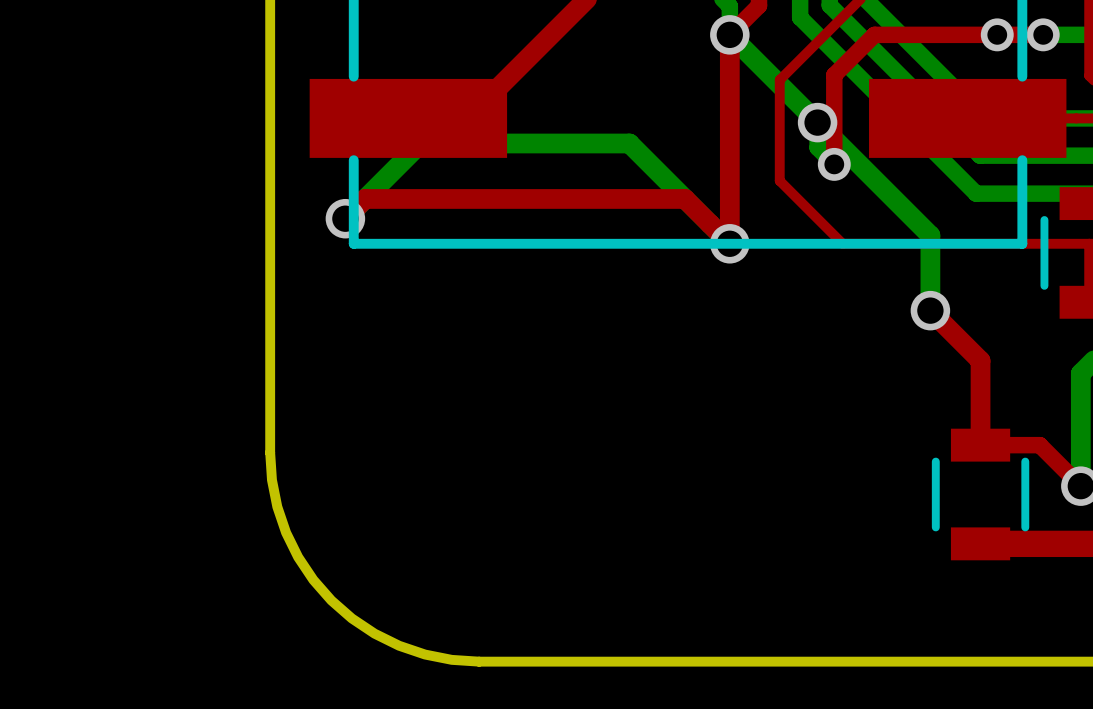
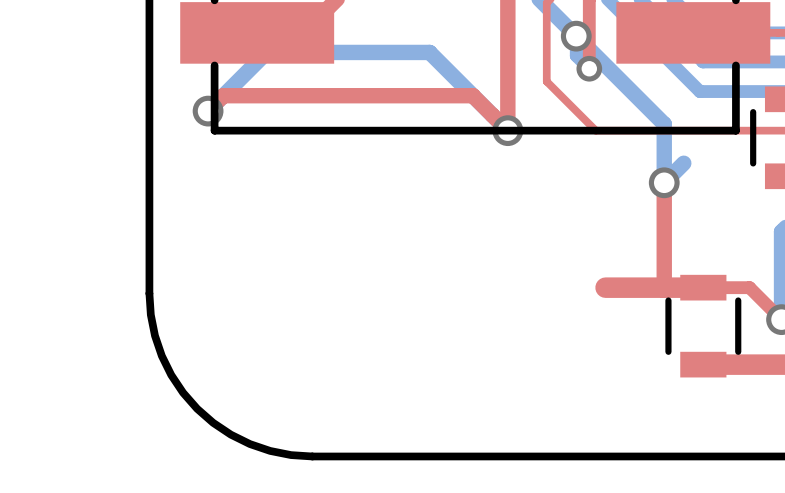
bottom track: none -> (683, 163) (664, 182)
top track: (930, 310) (980, 360) (980, 445) -> (664, 182) (664, 287)
top track: none -> (605, 287) (703, 287)

